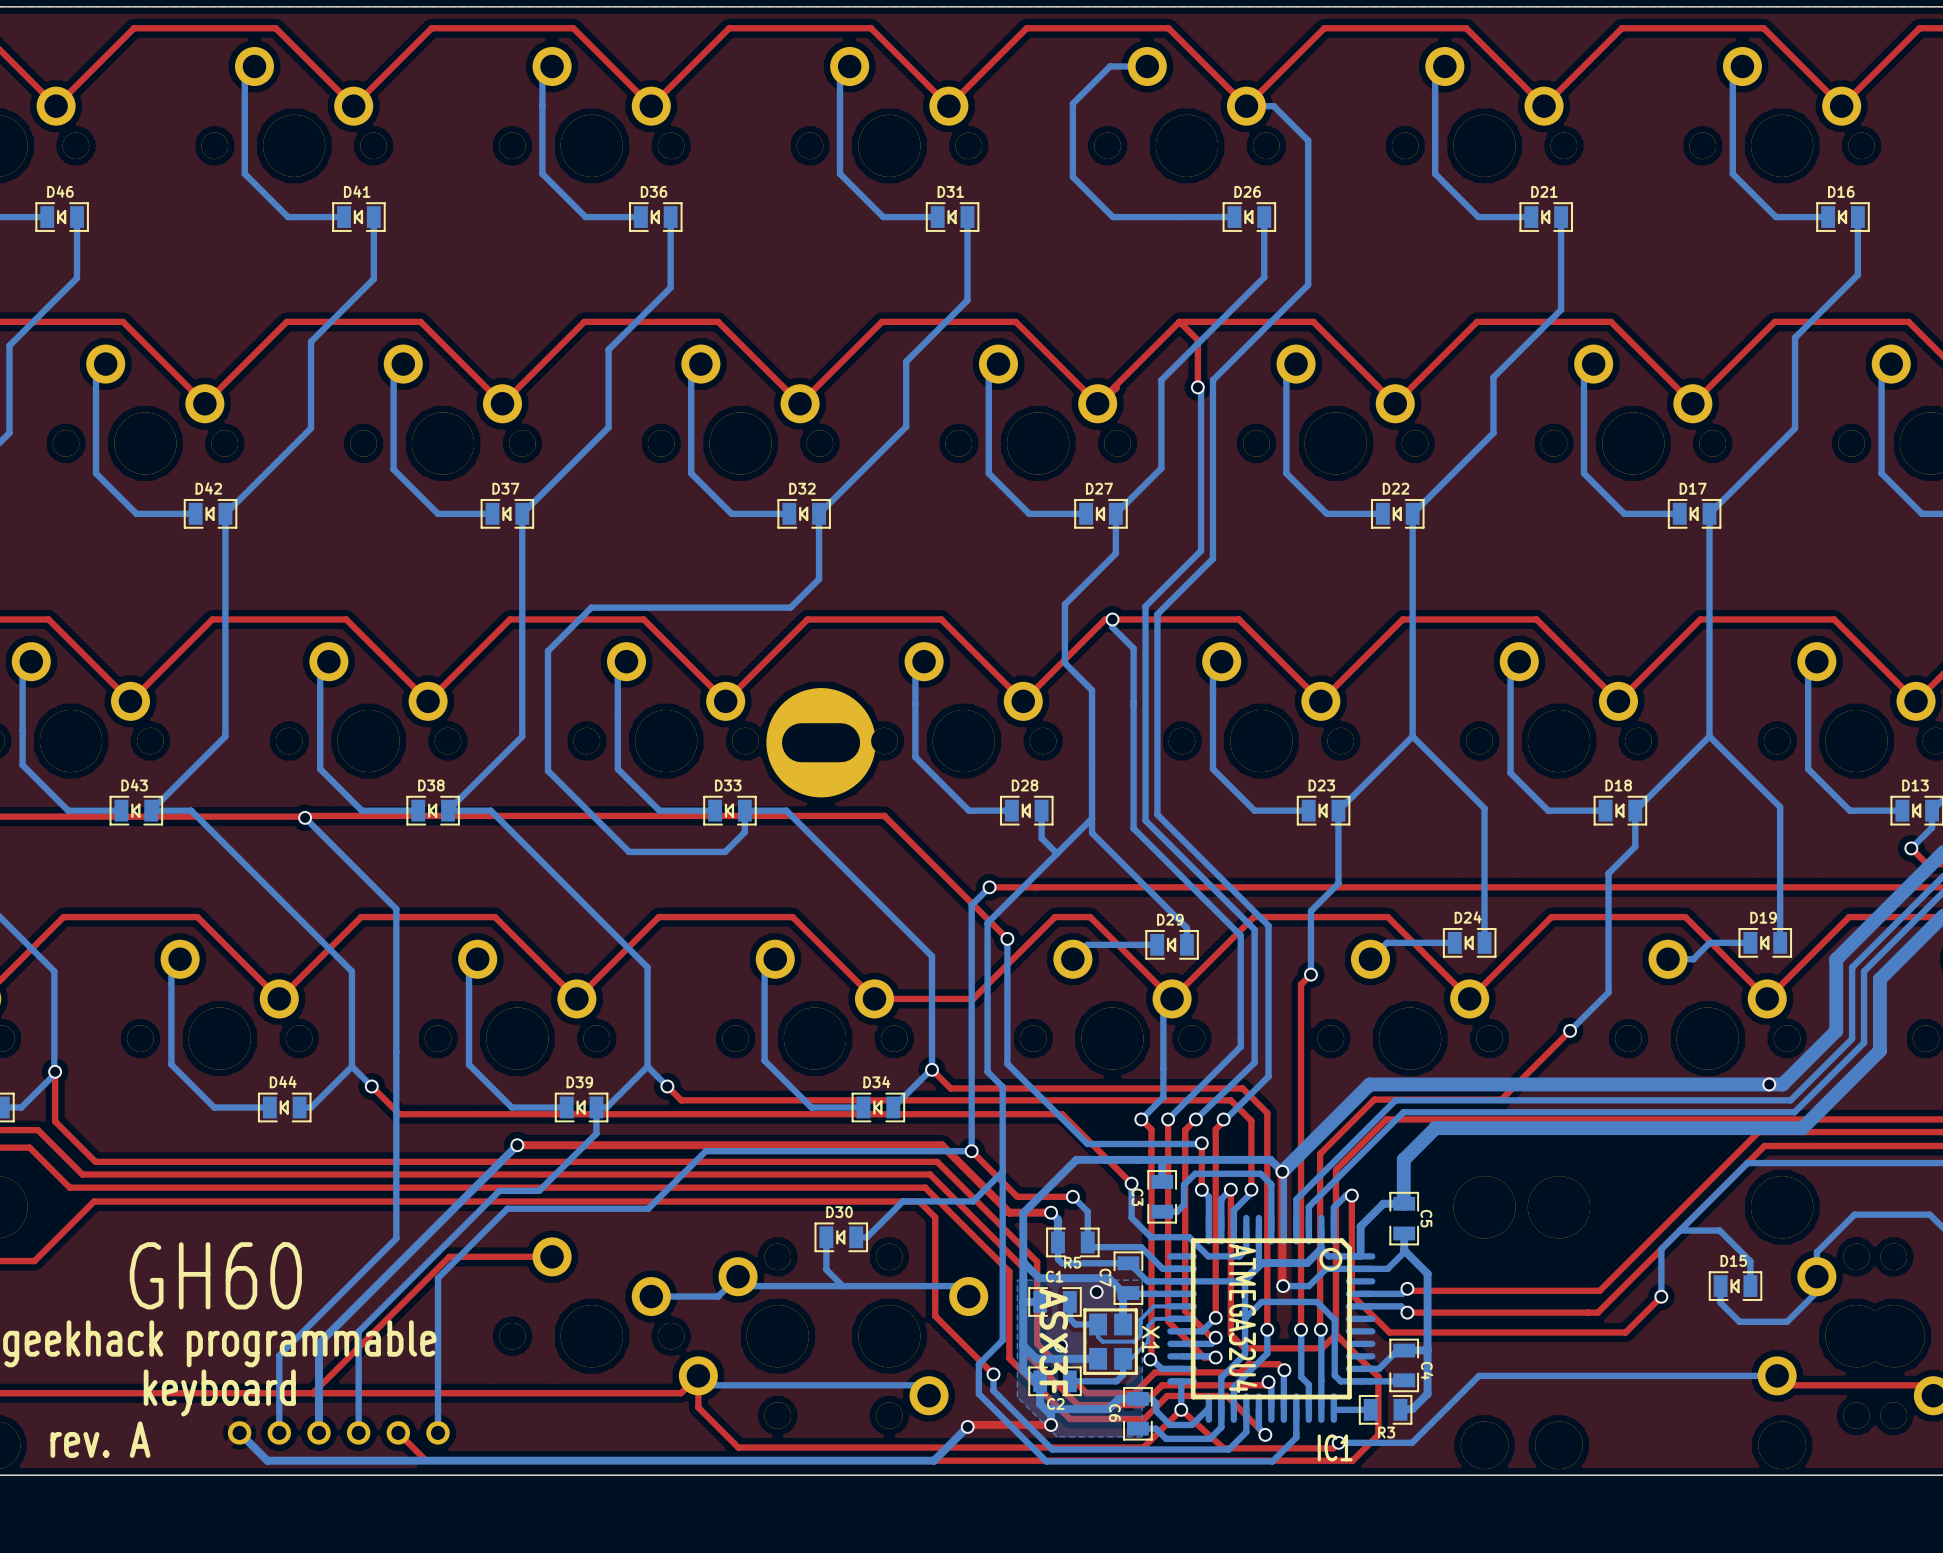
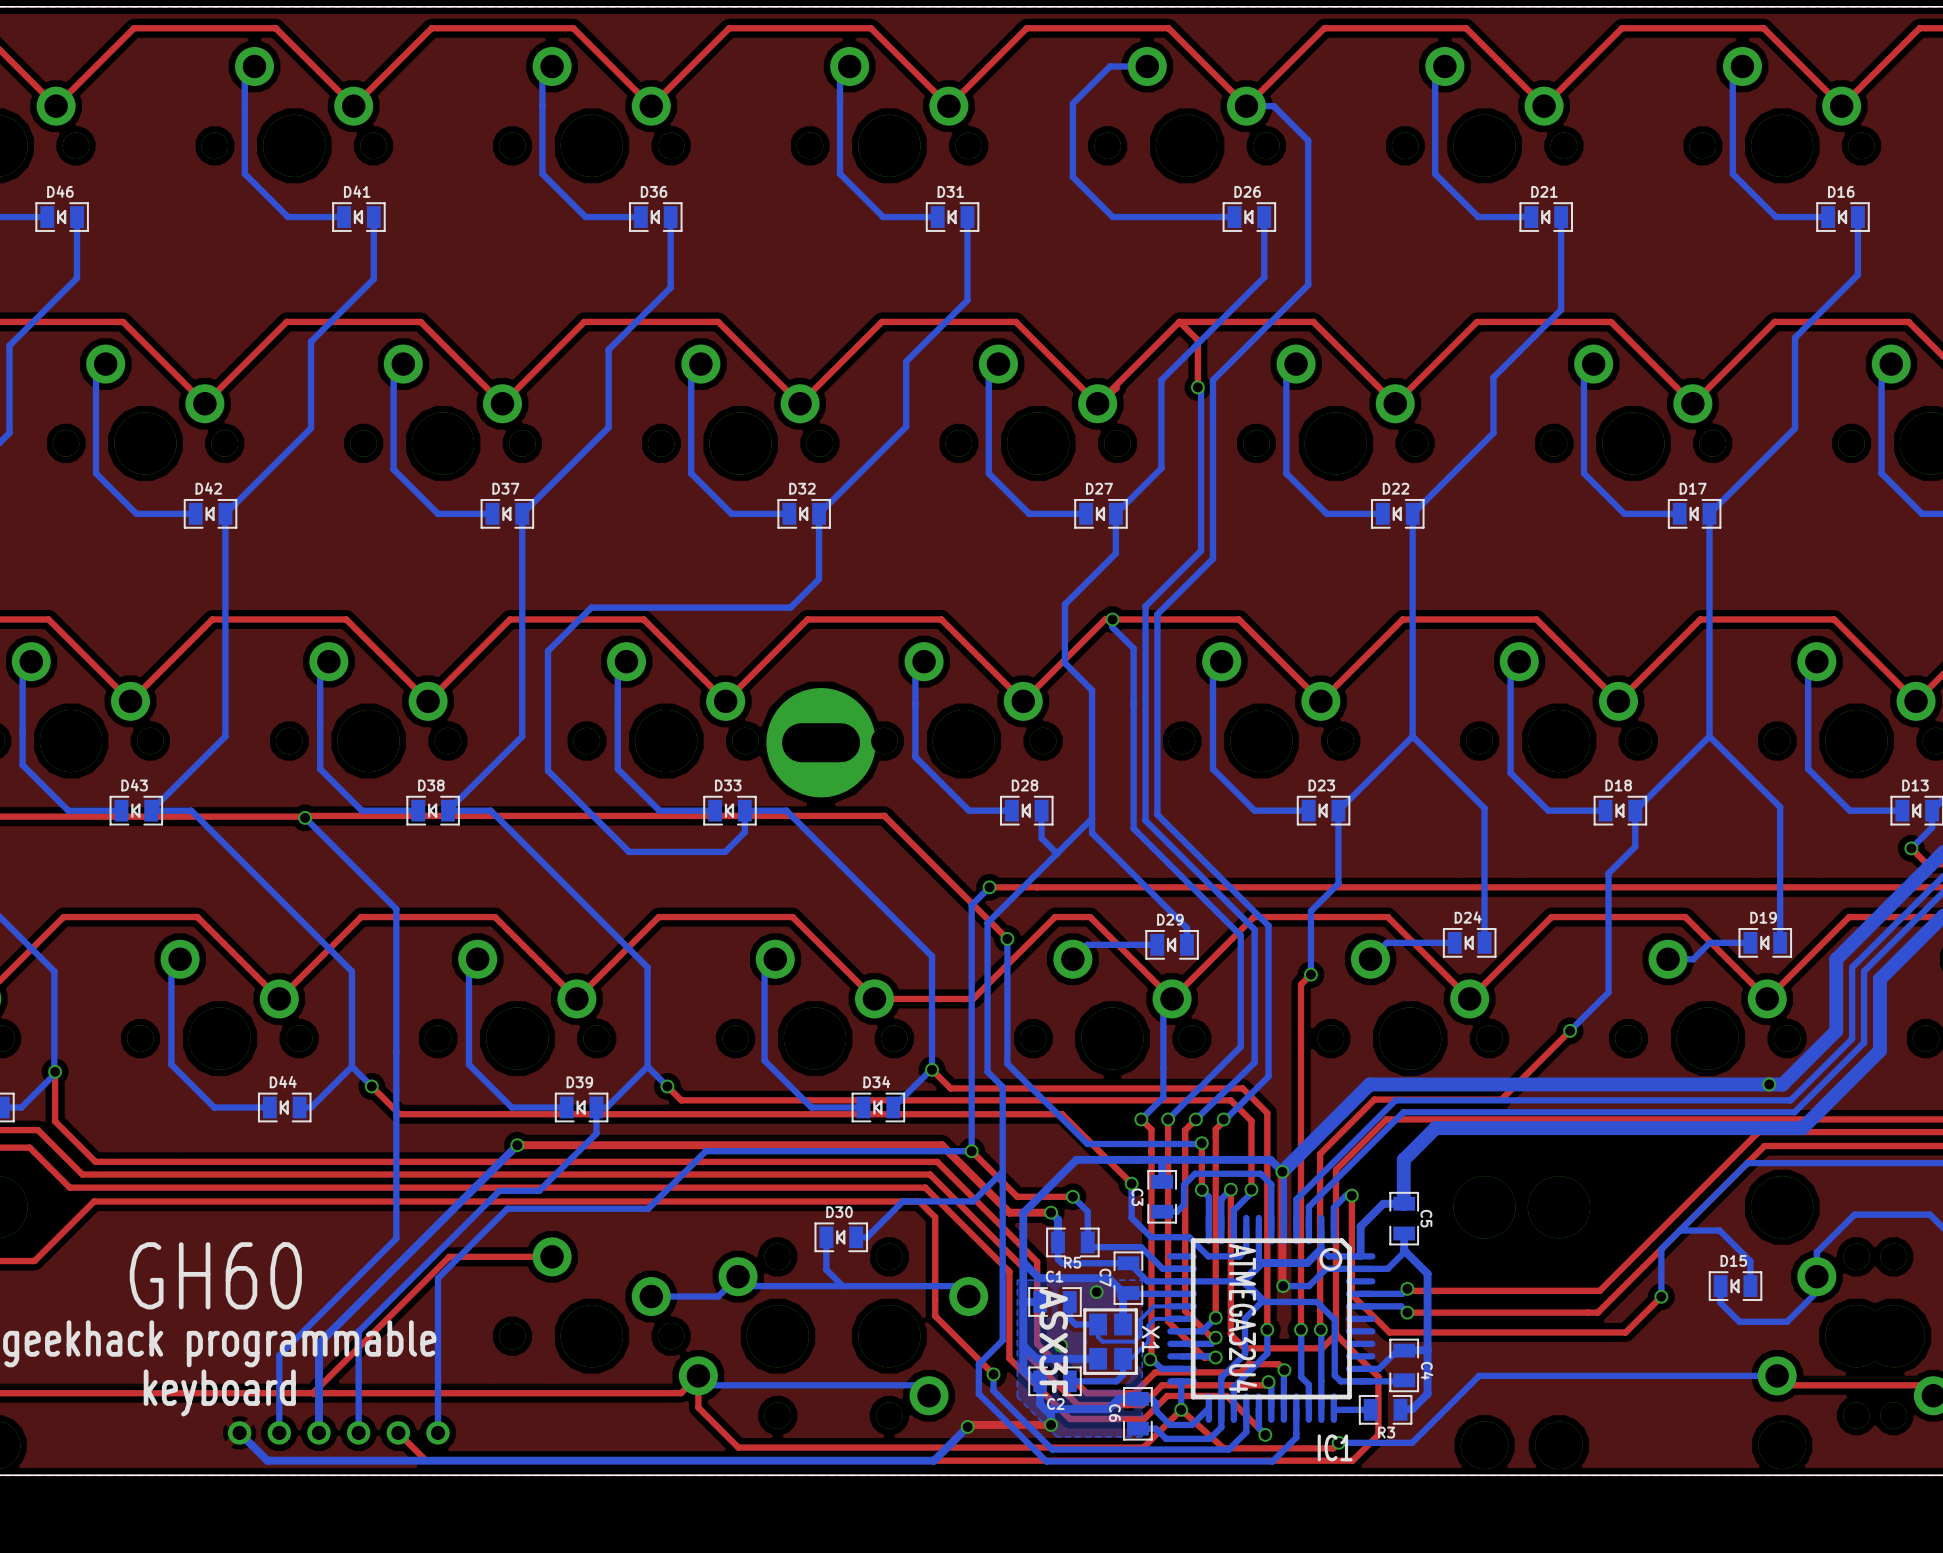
bottom track: (1245, 1279) (1245, 1318) -> none
bottom track: none -> (1243, 1281) (1262, 1300) (1261, 1301)
text: rev. A (100, 1439) -> none

